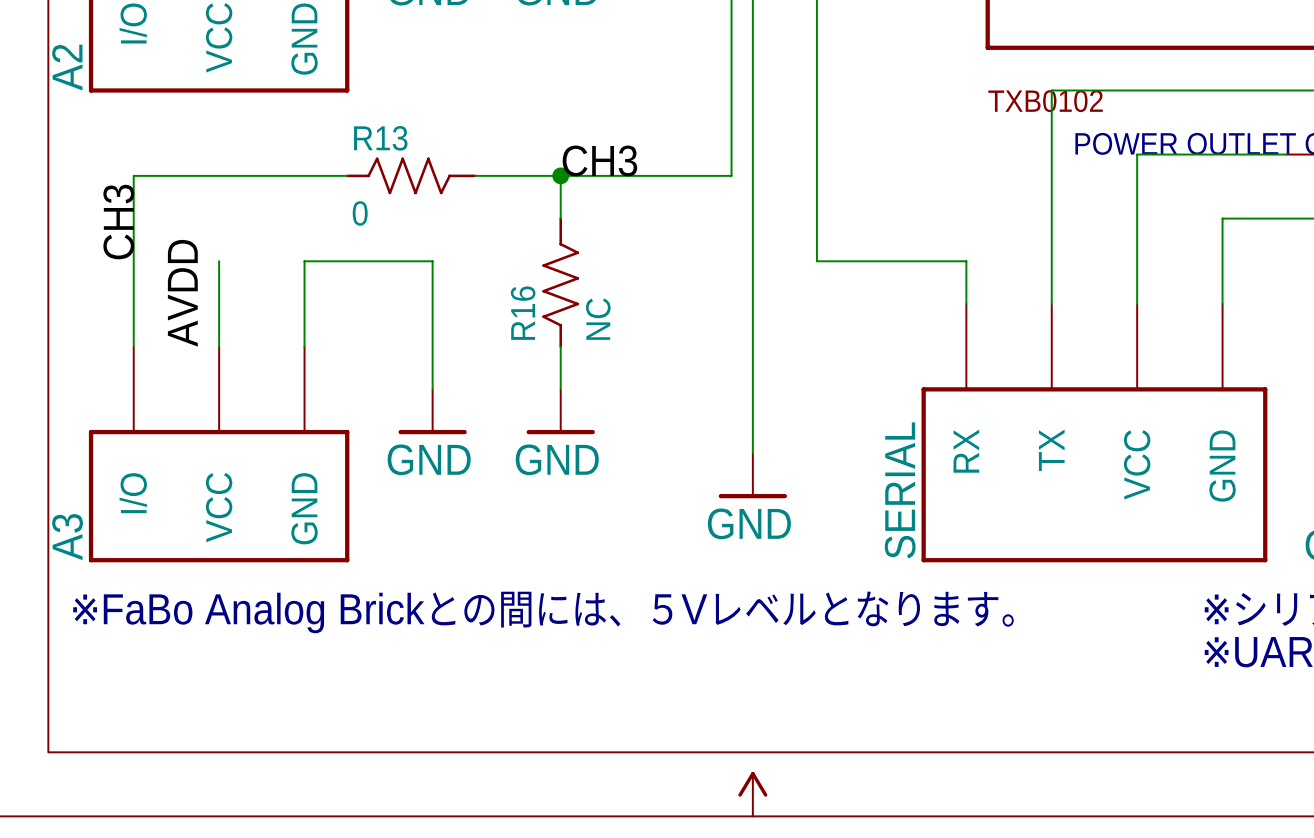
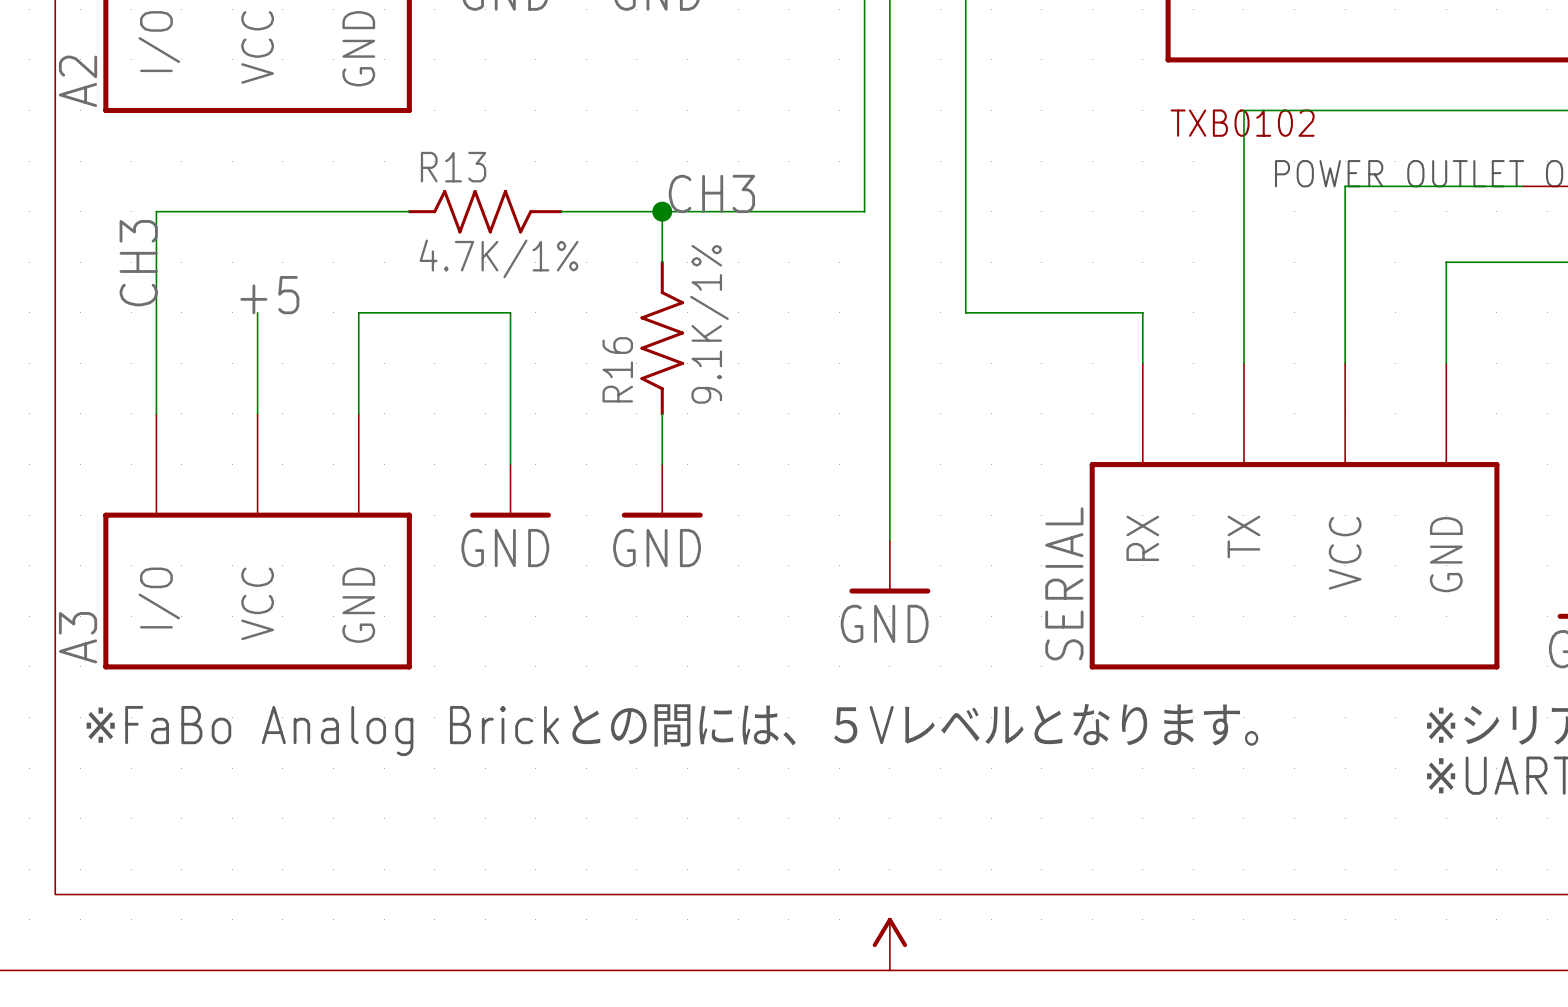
R13 value: 0 (360, 213) -> 4.7K/1% (499, 258)
label: none -> +5 (269, 295)
label: AVDD (182, 293) -> none
R16 value: NC (598, 319) -> 9.1K/1% (709, 324)

